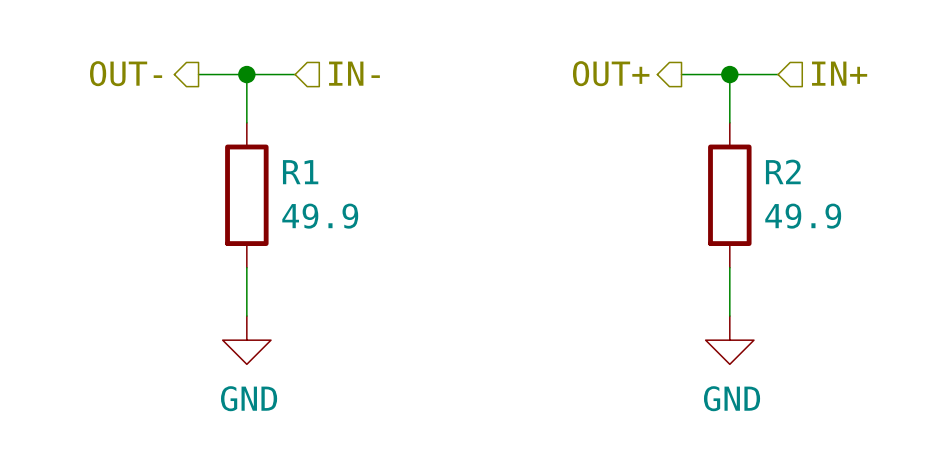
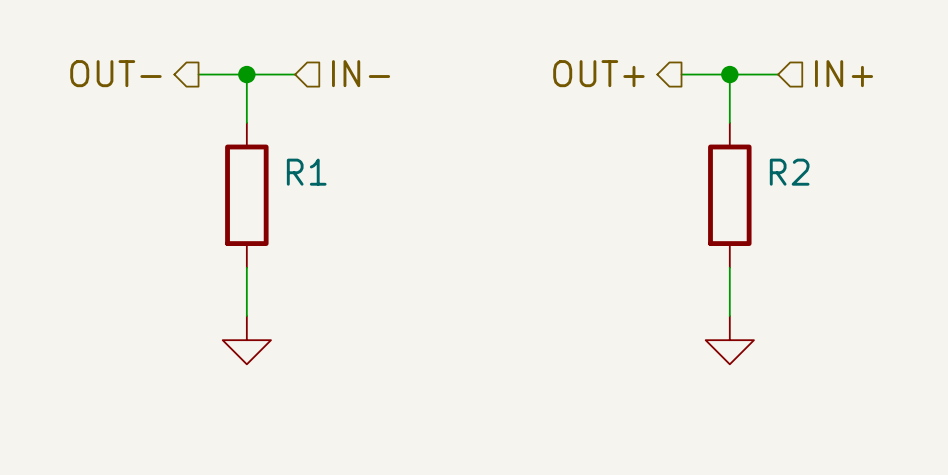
R1 value: 49.9 (320, 216) -> none
R2 value: 49.9 (803, 216) -> none
power symbol text: GND (249, 398) -> none
power symbol text: GND (732, 398) -> none

